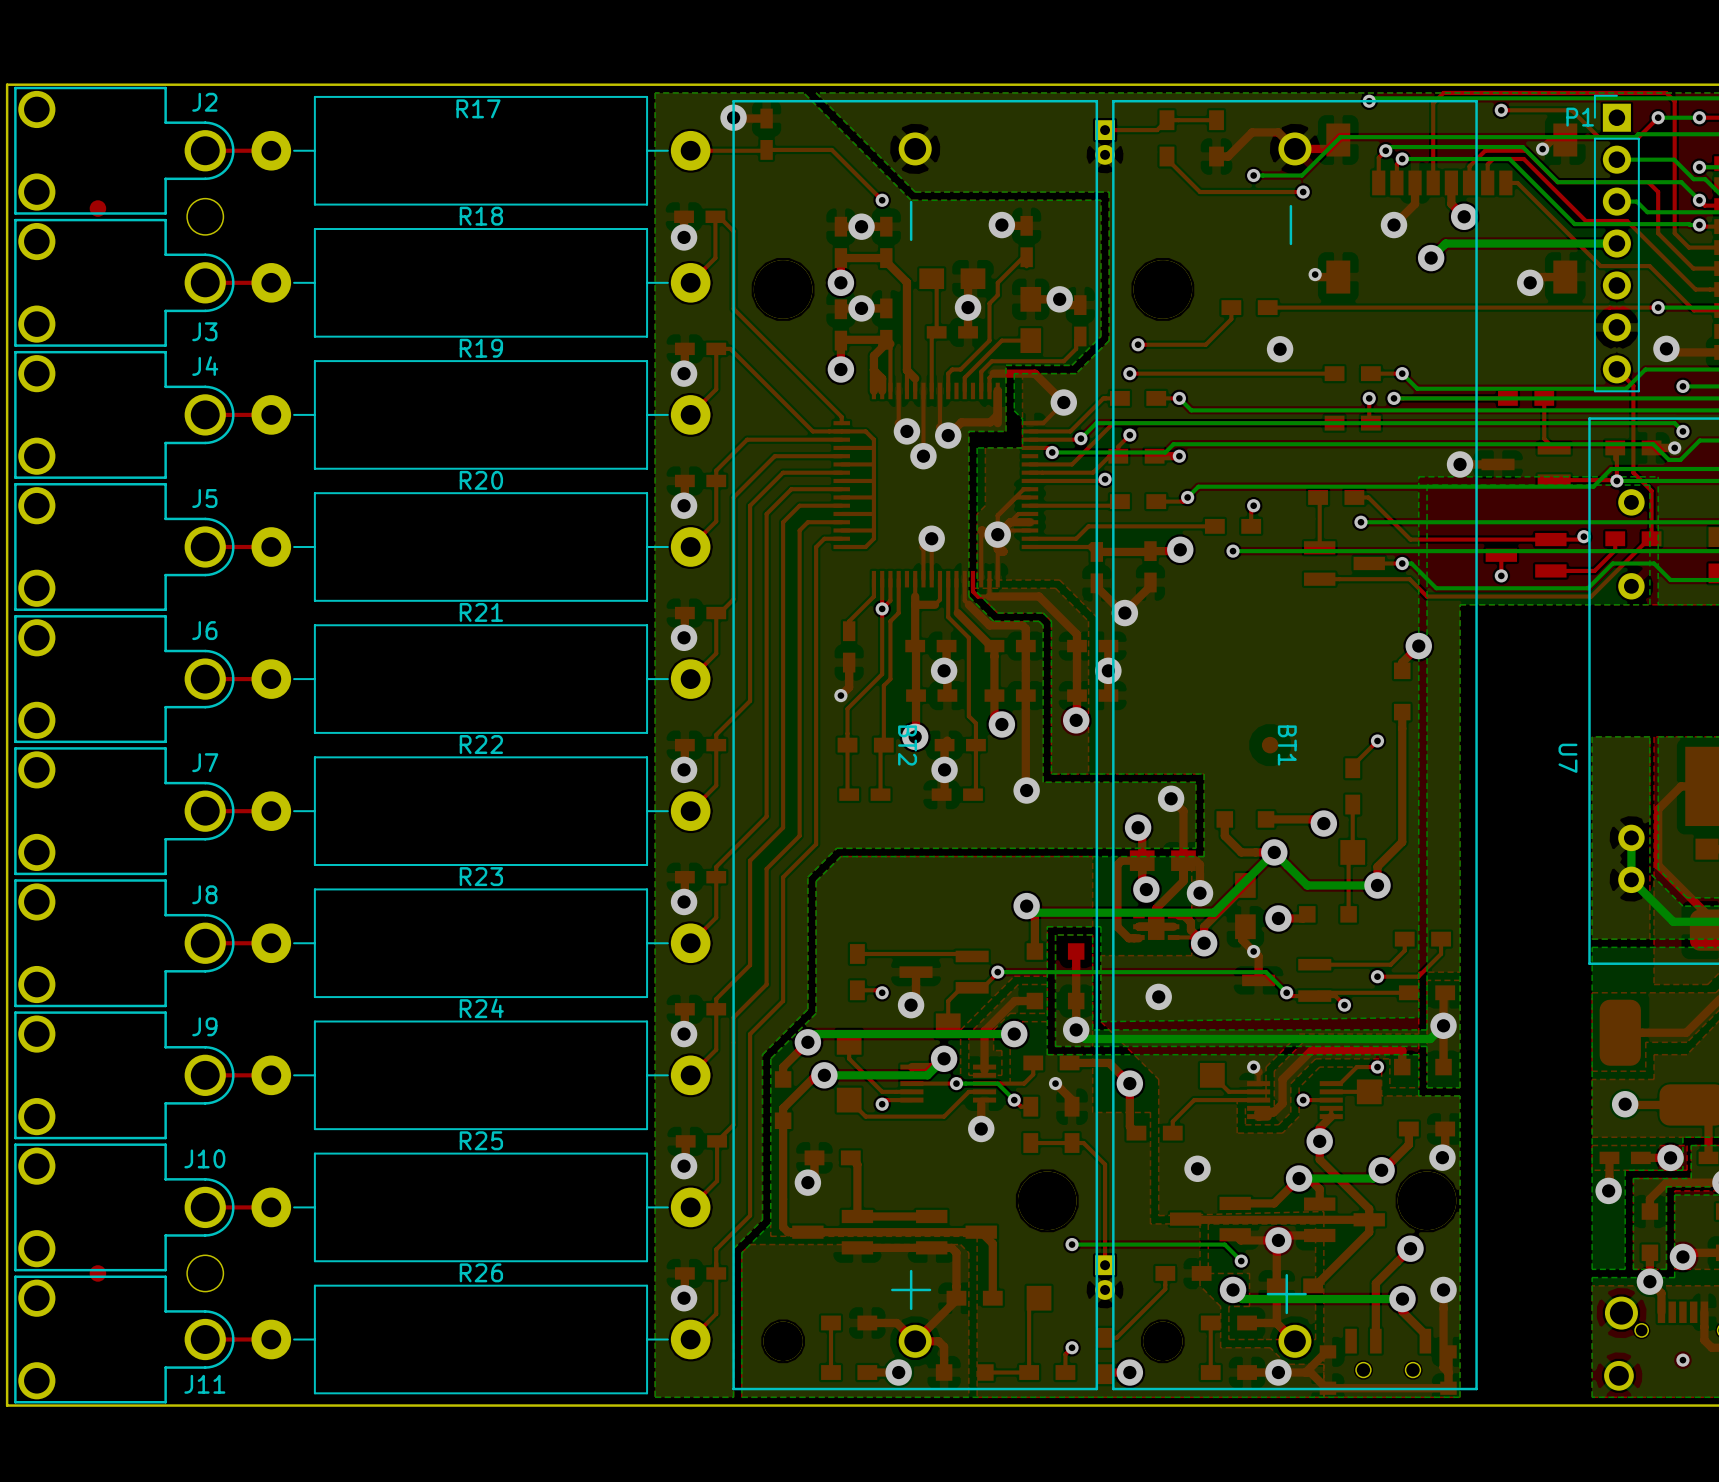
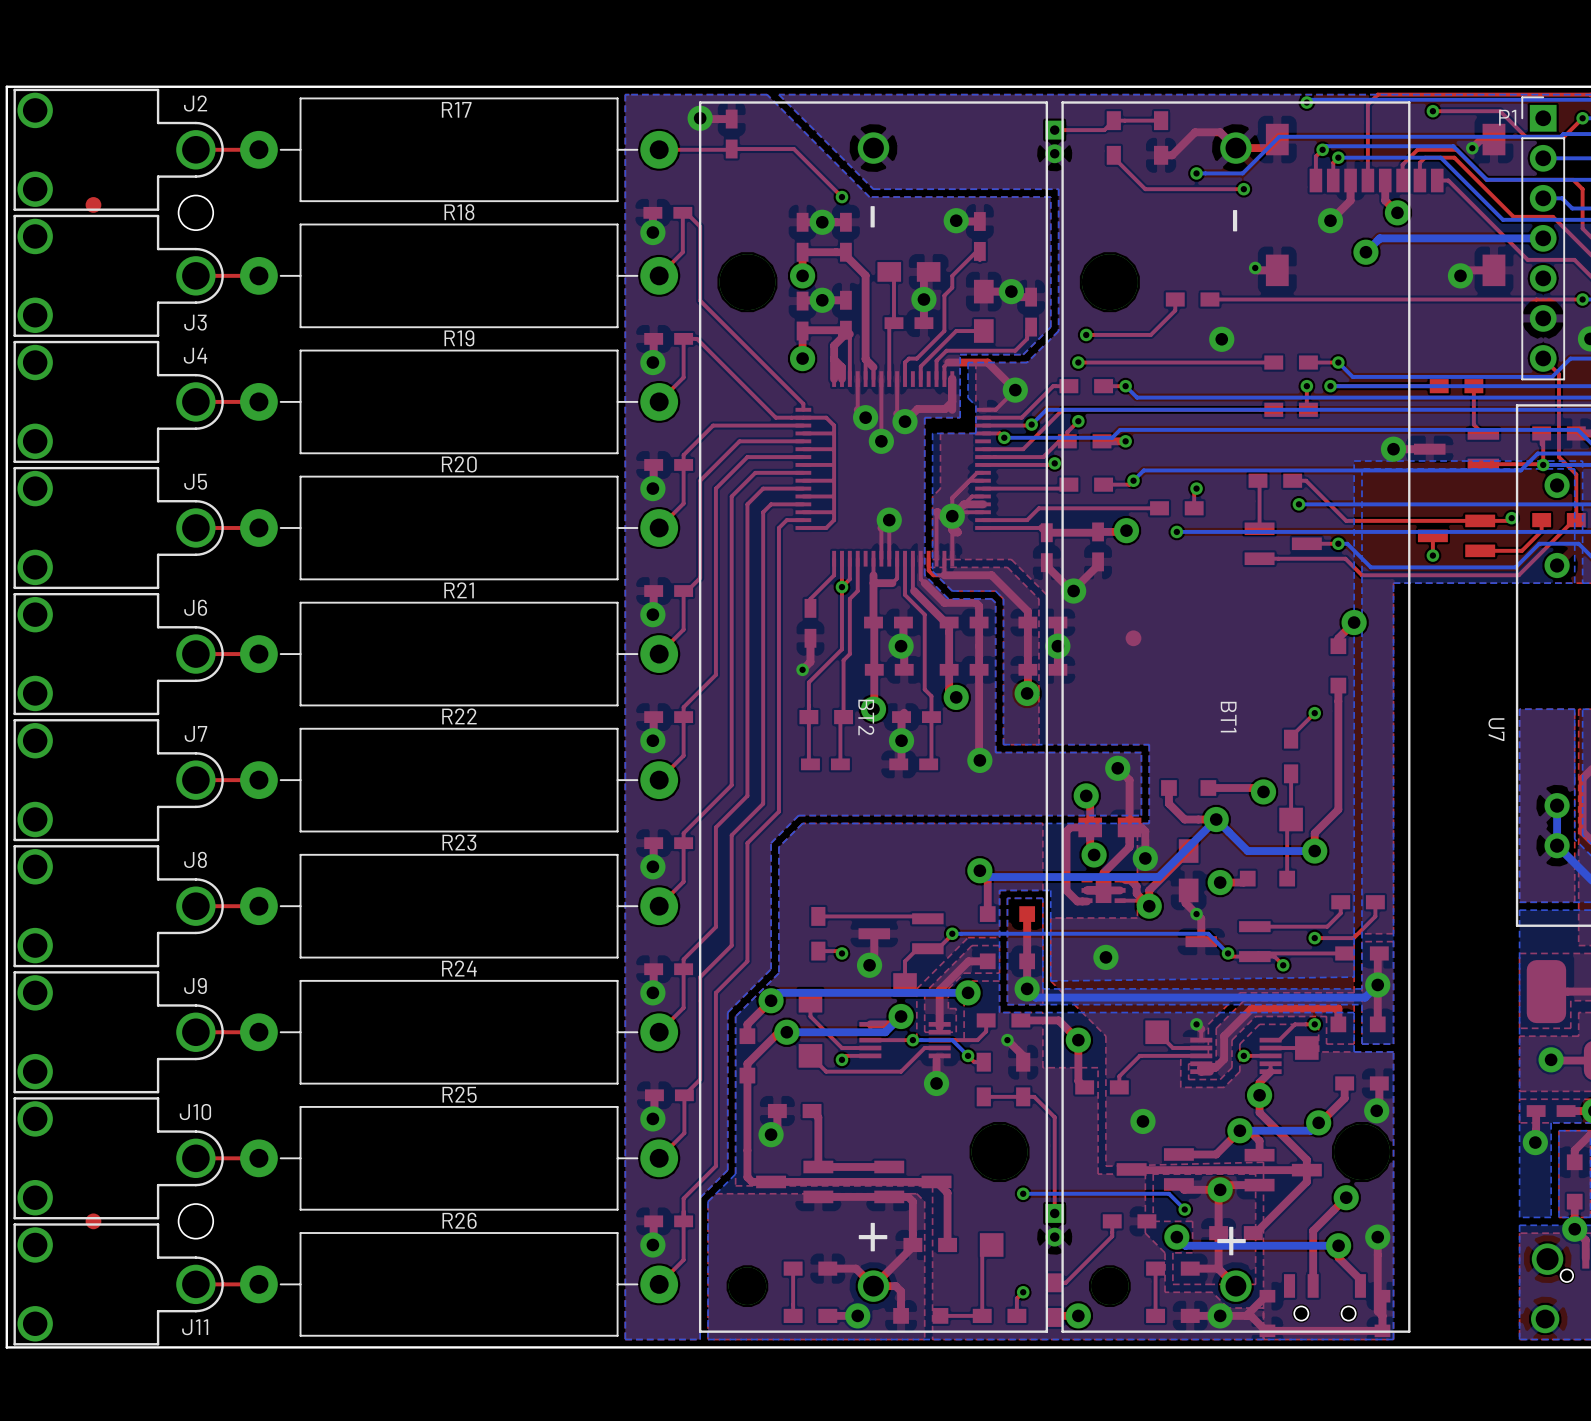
part position: (1270, 745) -> (1133, 638)

